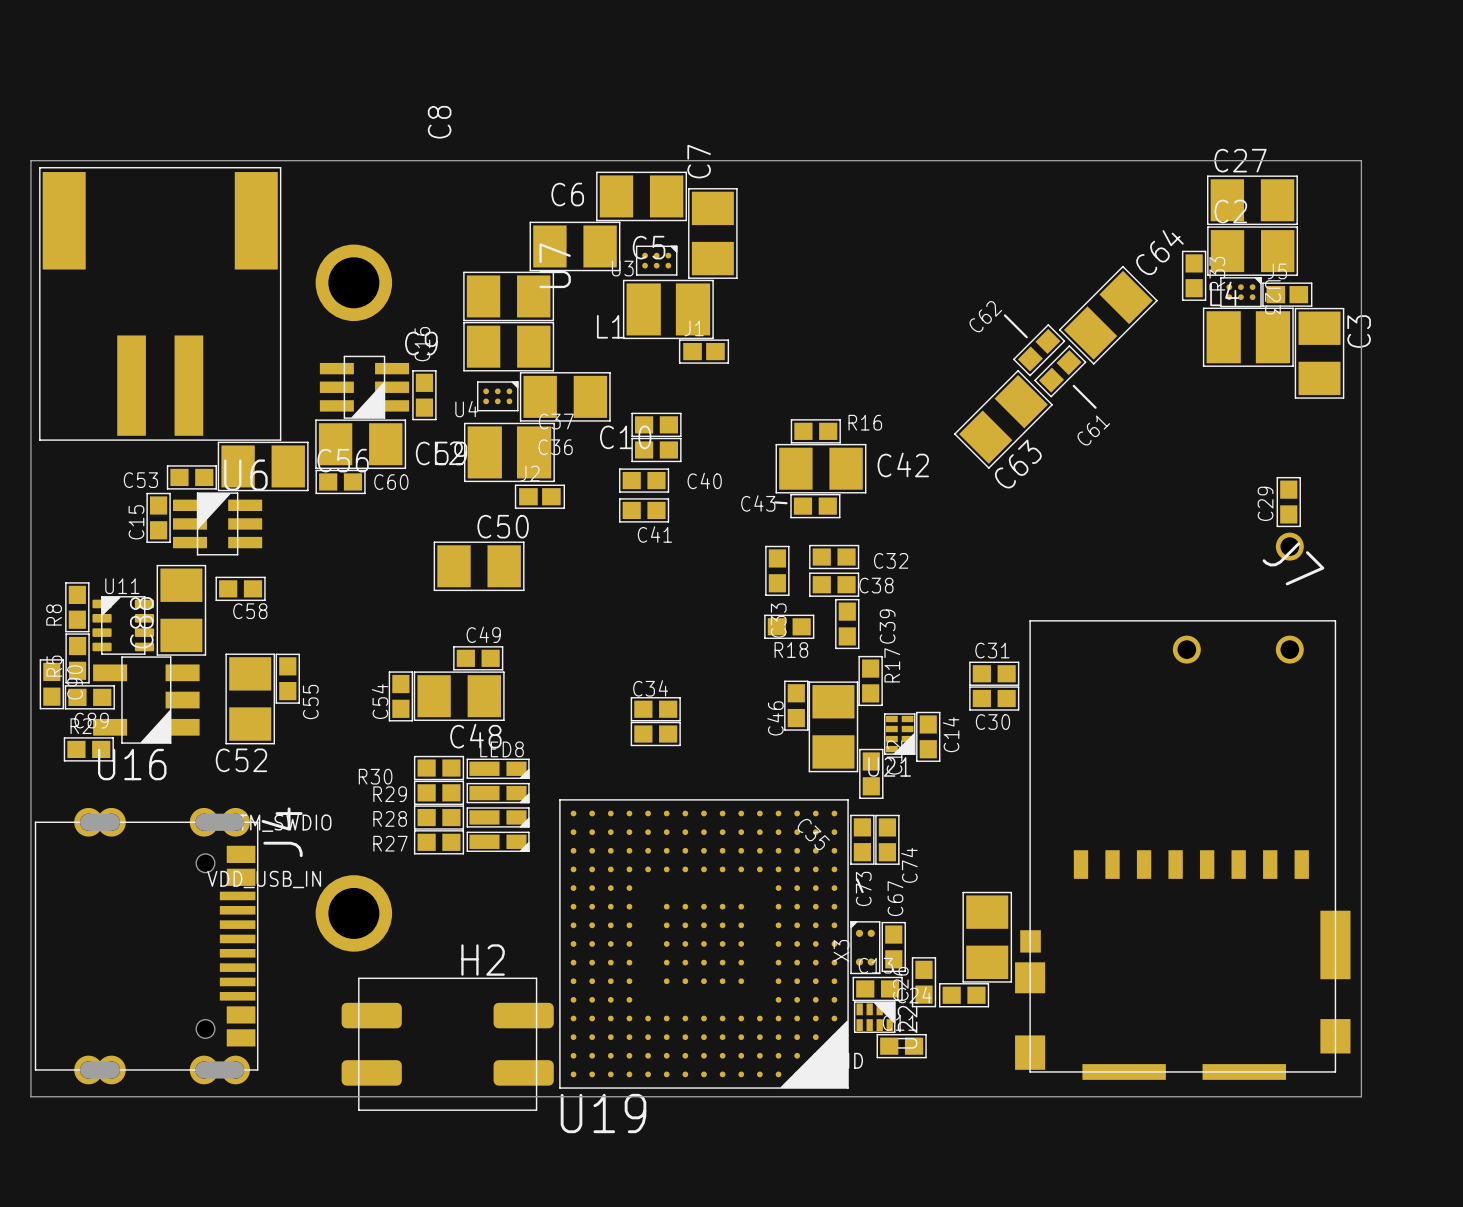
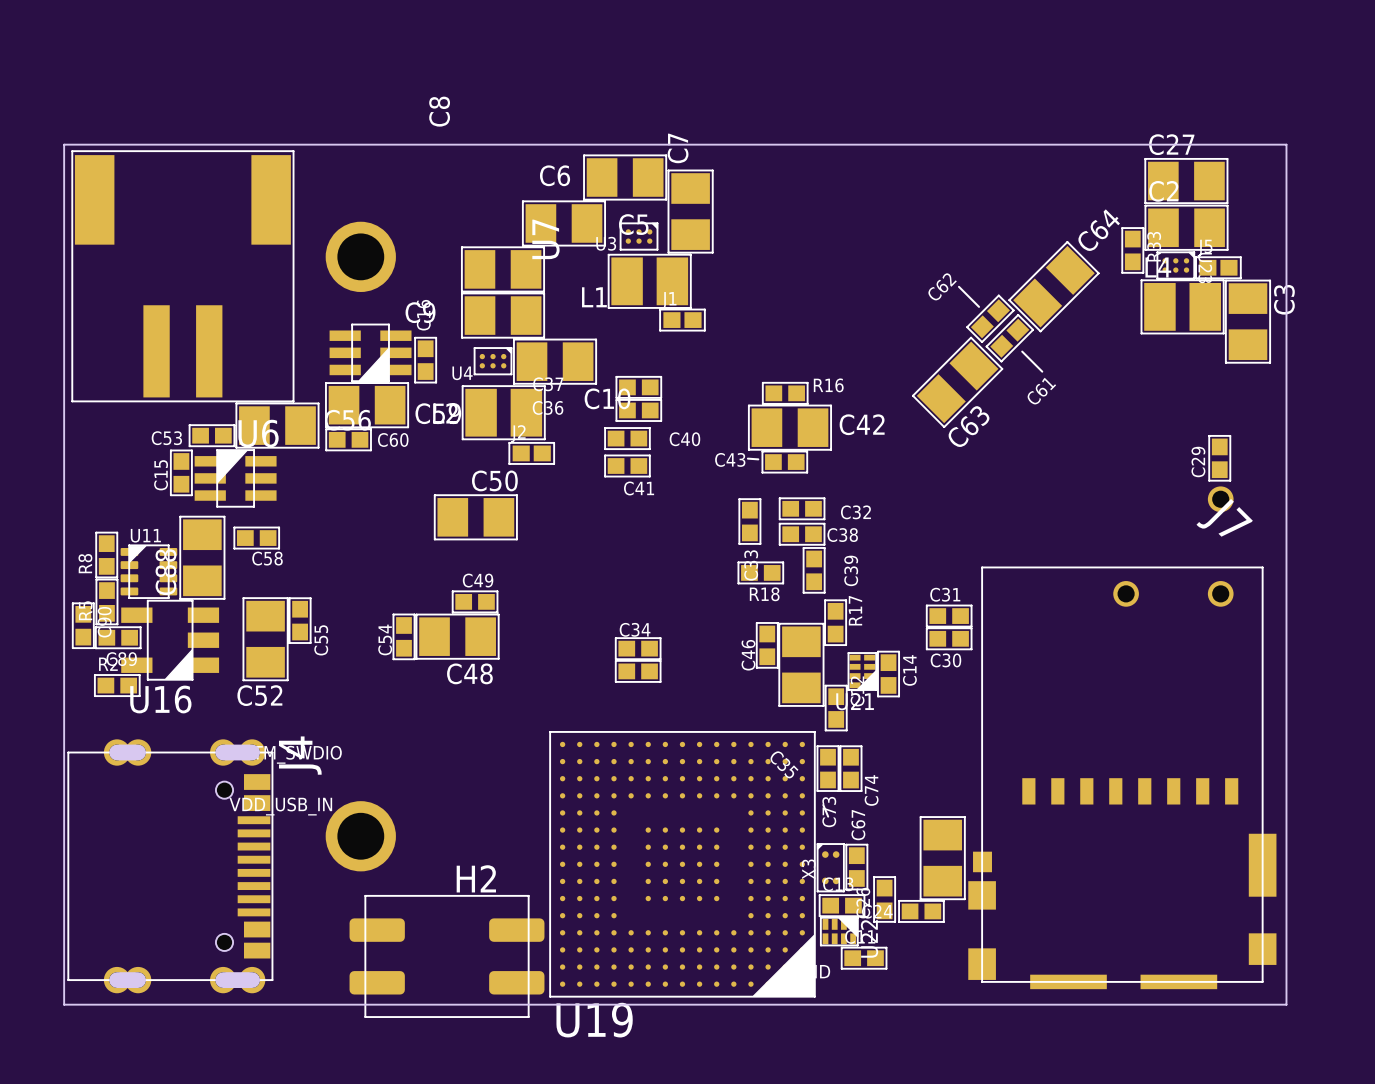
R30: (439, 768) -> none
LED8: (498, 768) -> none
R29: (439, 792) -> none
part: (498, 793) -> none
R28: (439, 817) -> none
part: (498, 817) -> none
part: (498, 841) -> none
R27: (439, 842) -> none

